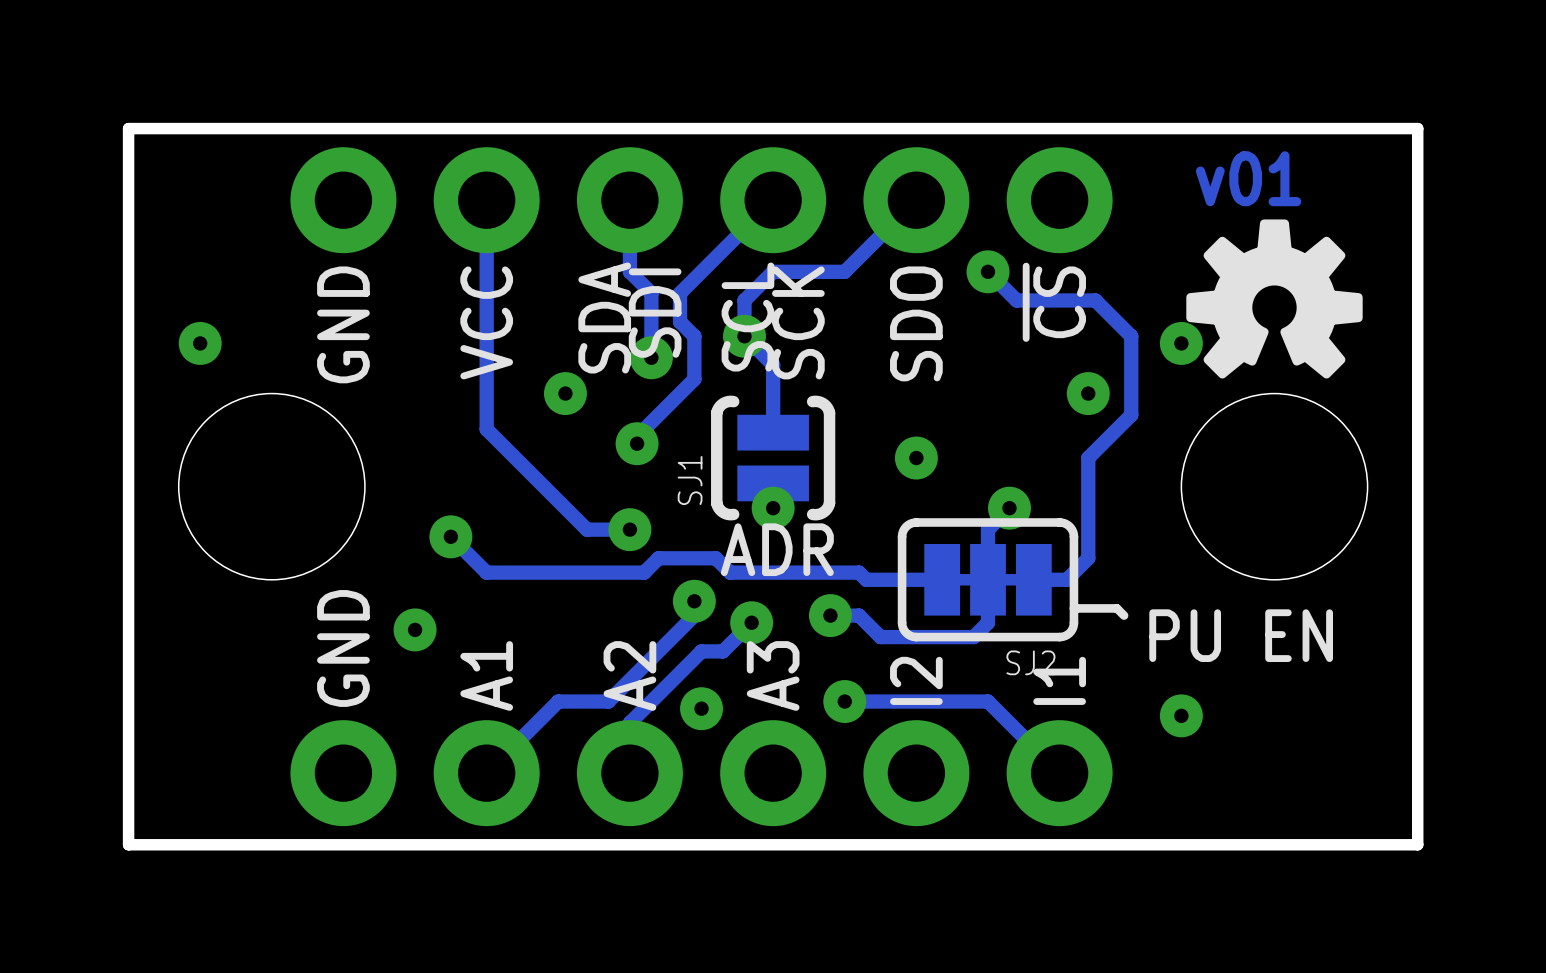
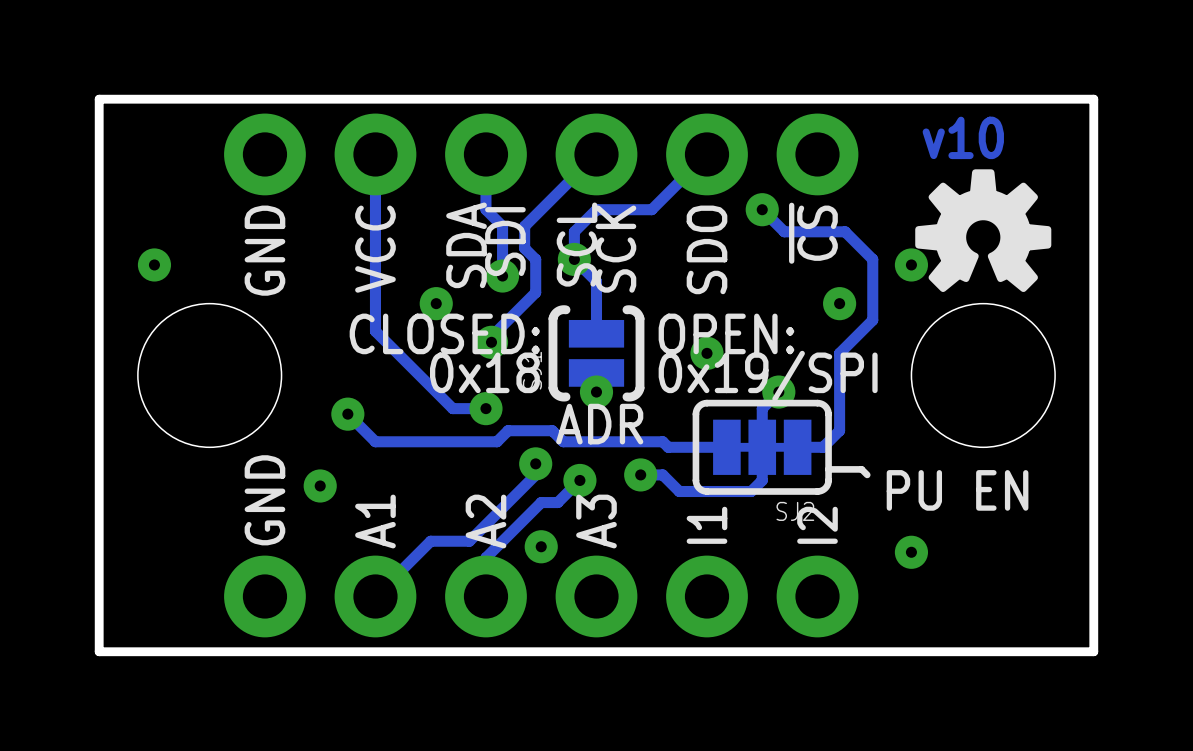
text: v01 (1248, 178) -> v10 (963, 137)
text: none -> CLOSED: (444, 333)
text: none -> OPEN: (726, 333)
text: none -> 0x18 (484, 372)
text: none -> 0x19/SPI (768, 376)
text: I2 (916, 680) -> I1 (707, 525)
text: I1 (1059, 680) -> I2 (817, 525)
track: (844, 701) (988, 701) (1059, 773) -> none
via: (844, 701) -> none

